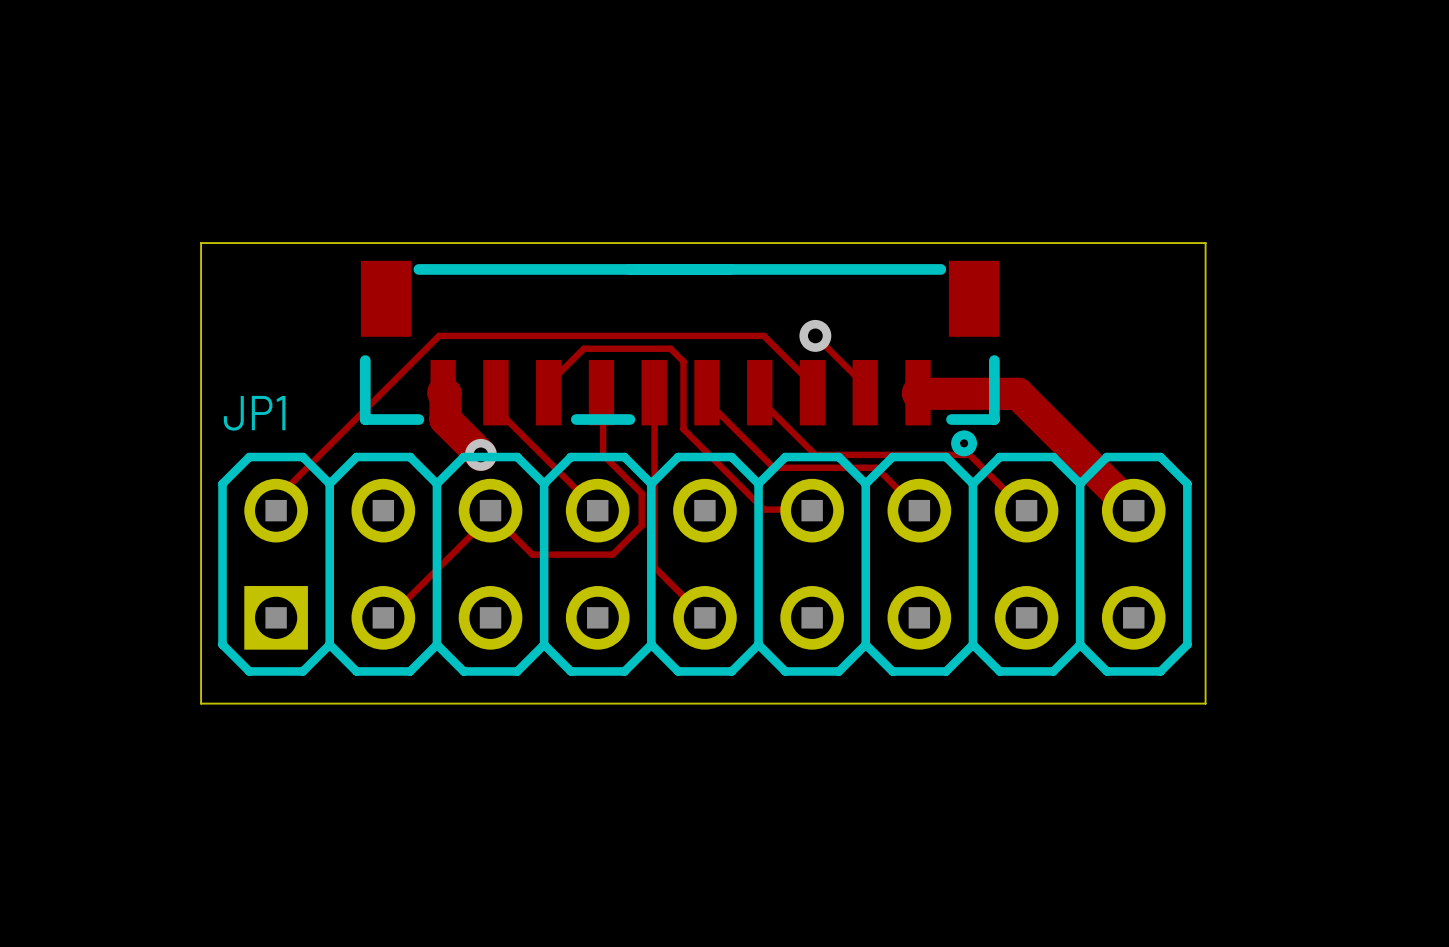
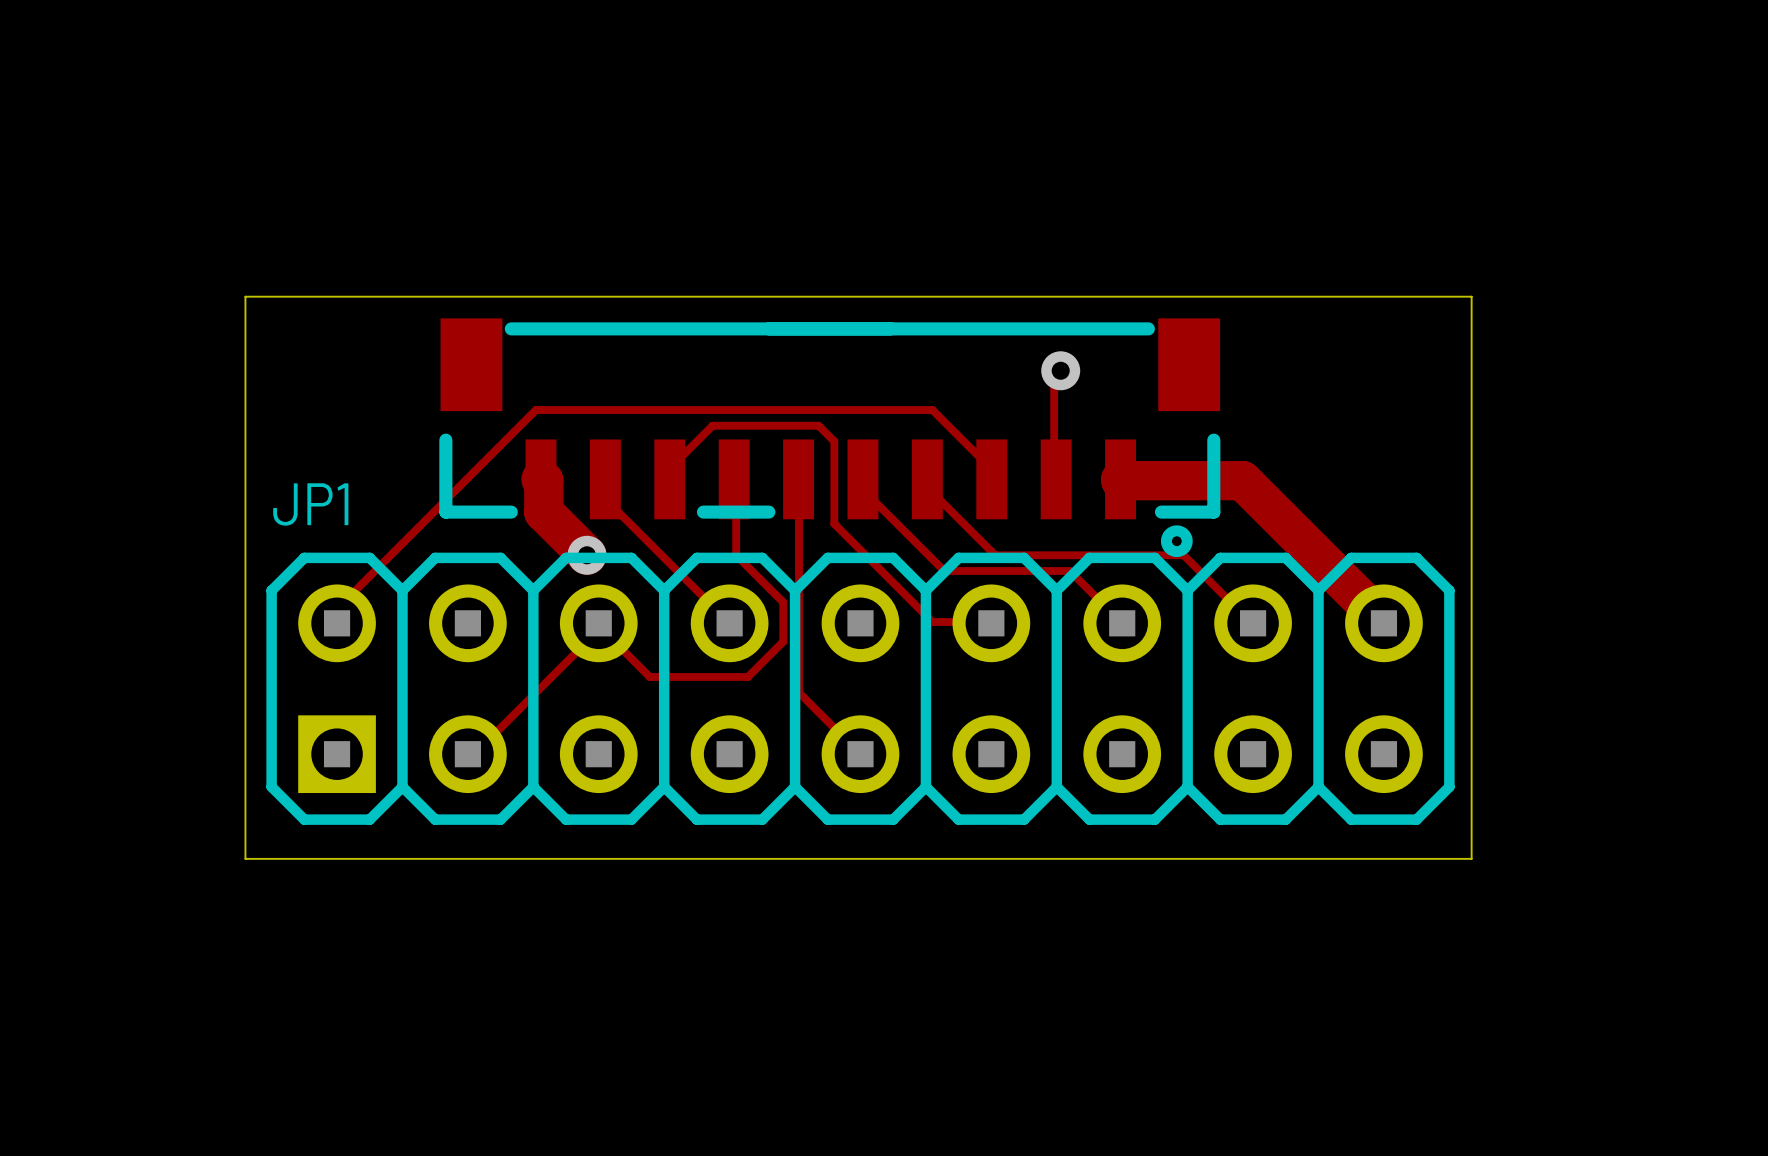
track: (815, 335) (863, 384) -> (1060, 370) (1054, 377) (1054, 468)
via position: (815, 335) -> (1060, 370)

